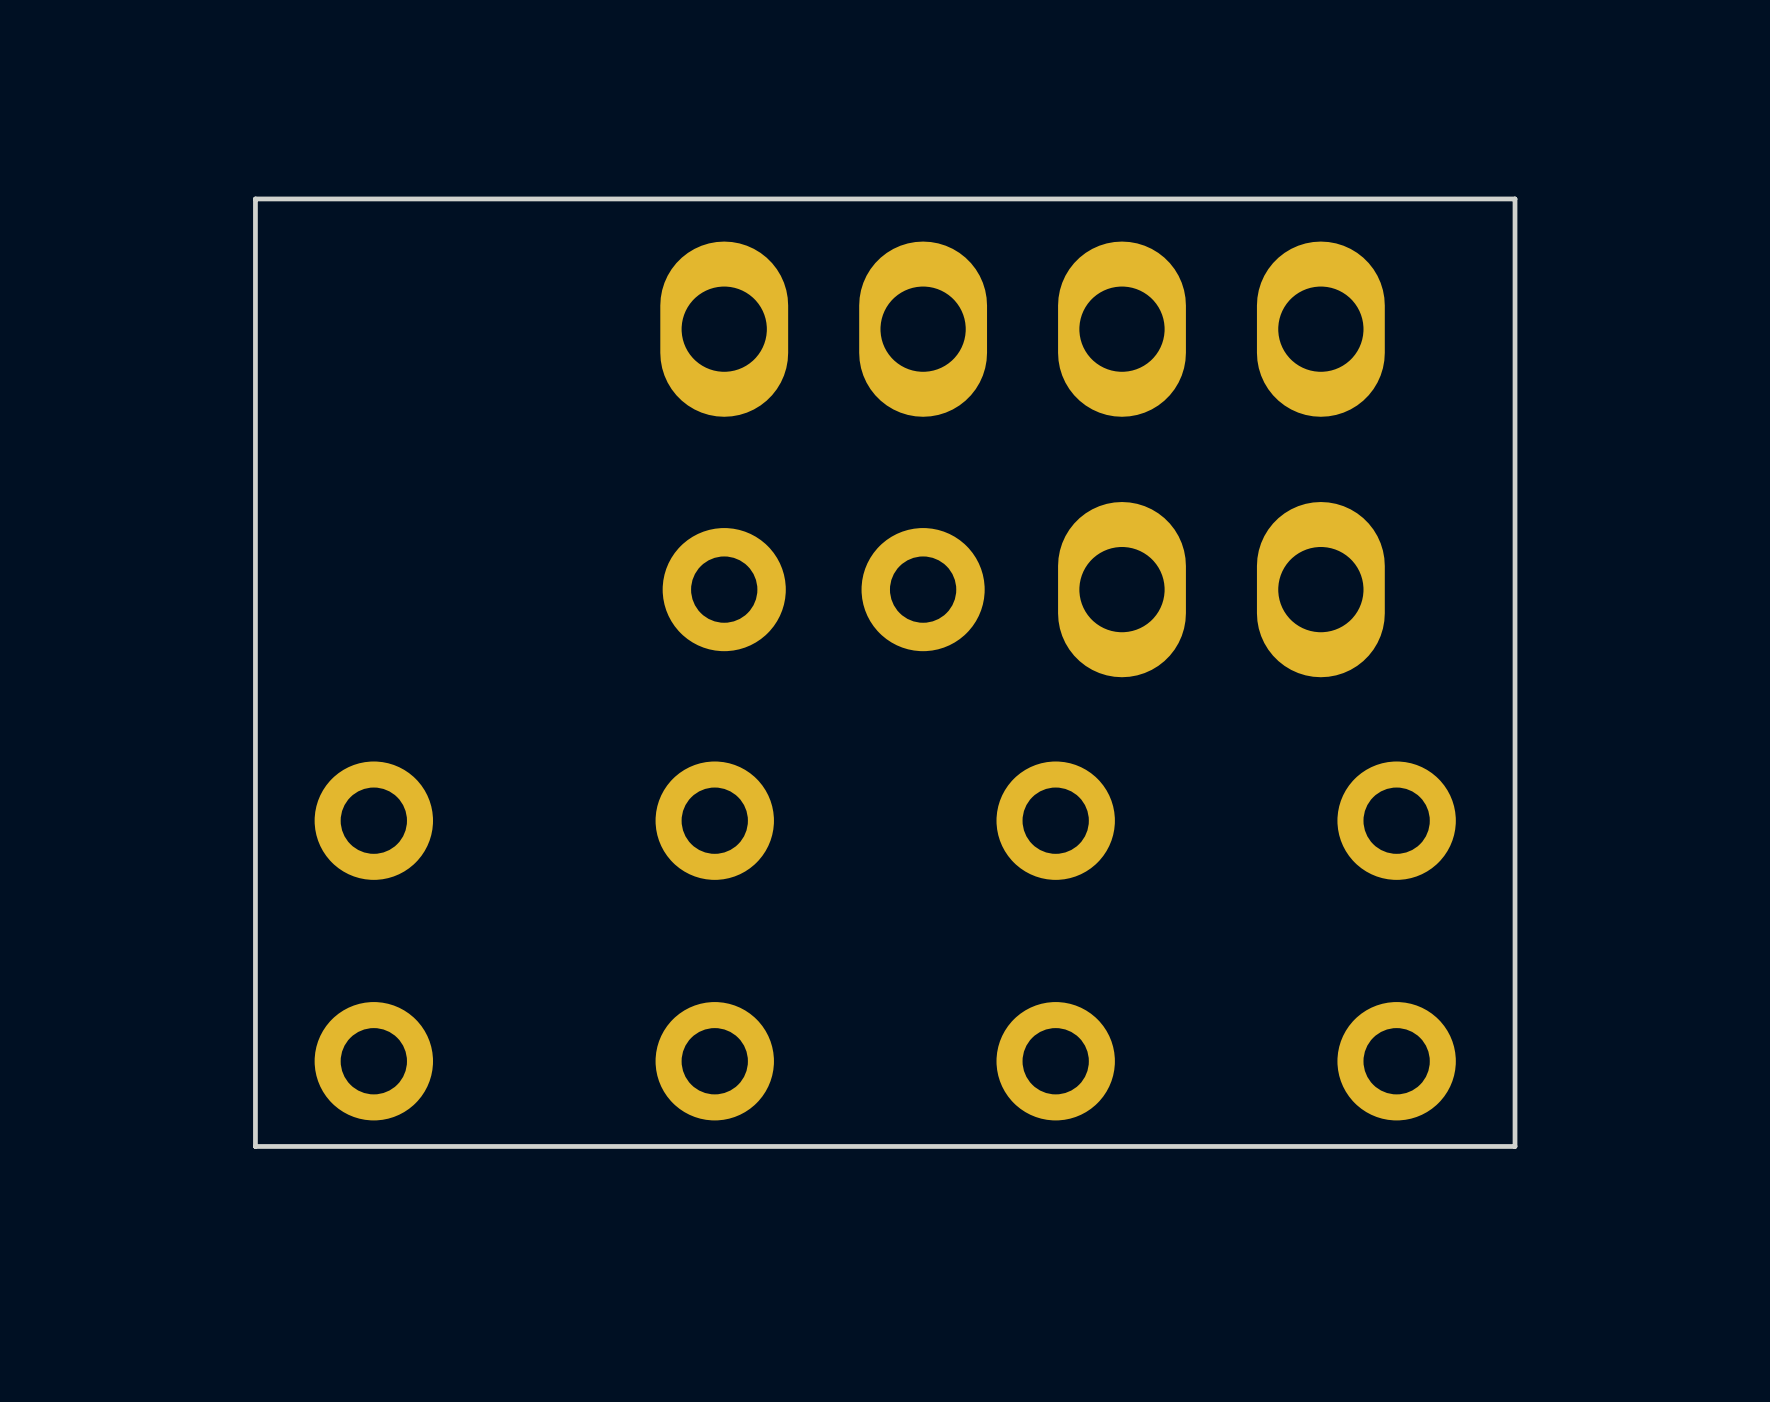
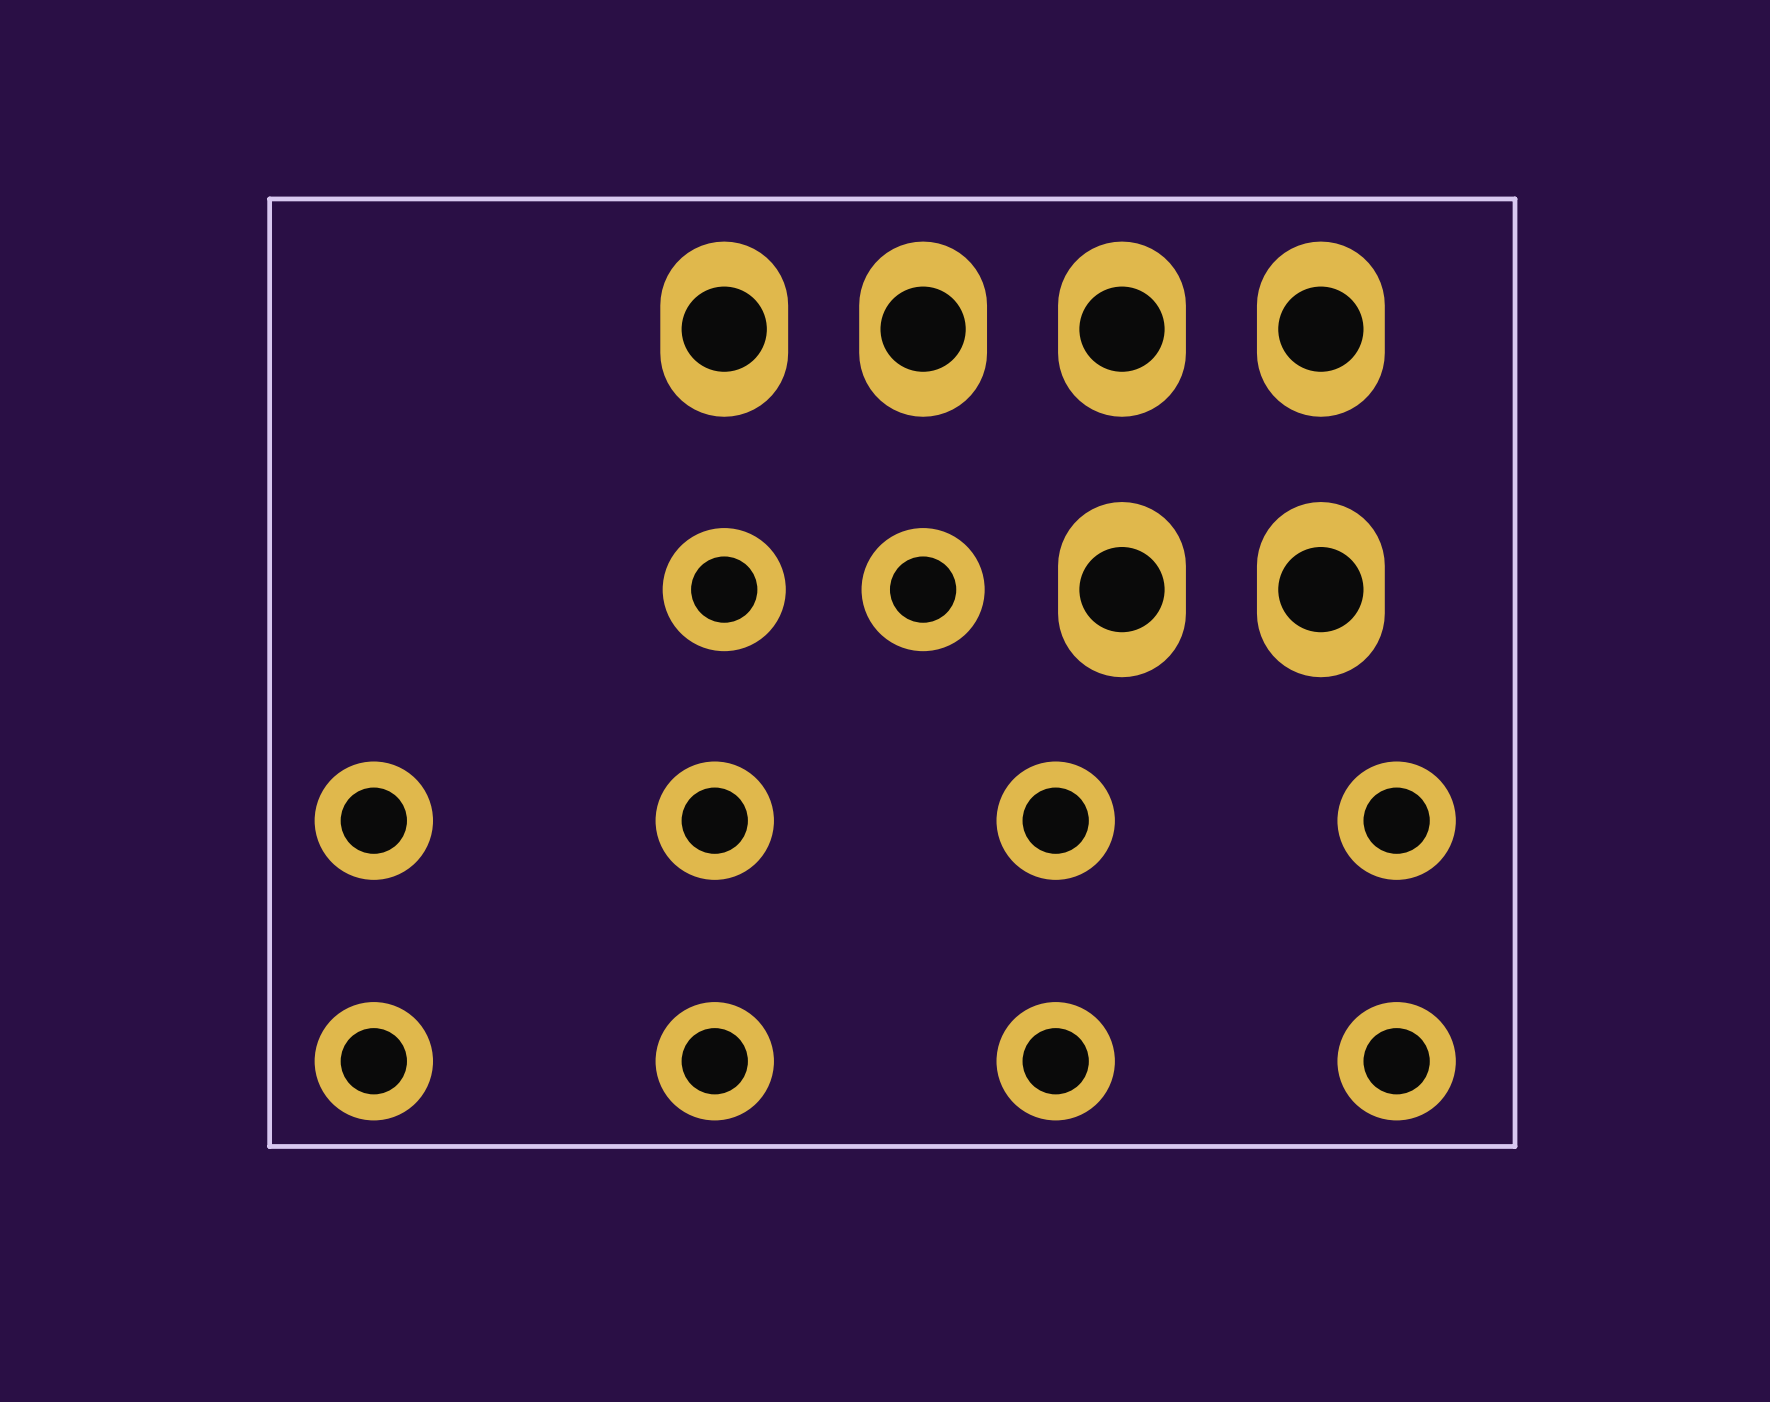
board edge: (269, 198) (255, 198) (255, 1146) (269, 1146) -> (269, 198) (269, 1146)

